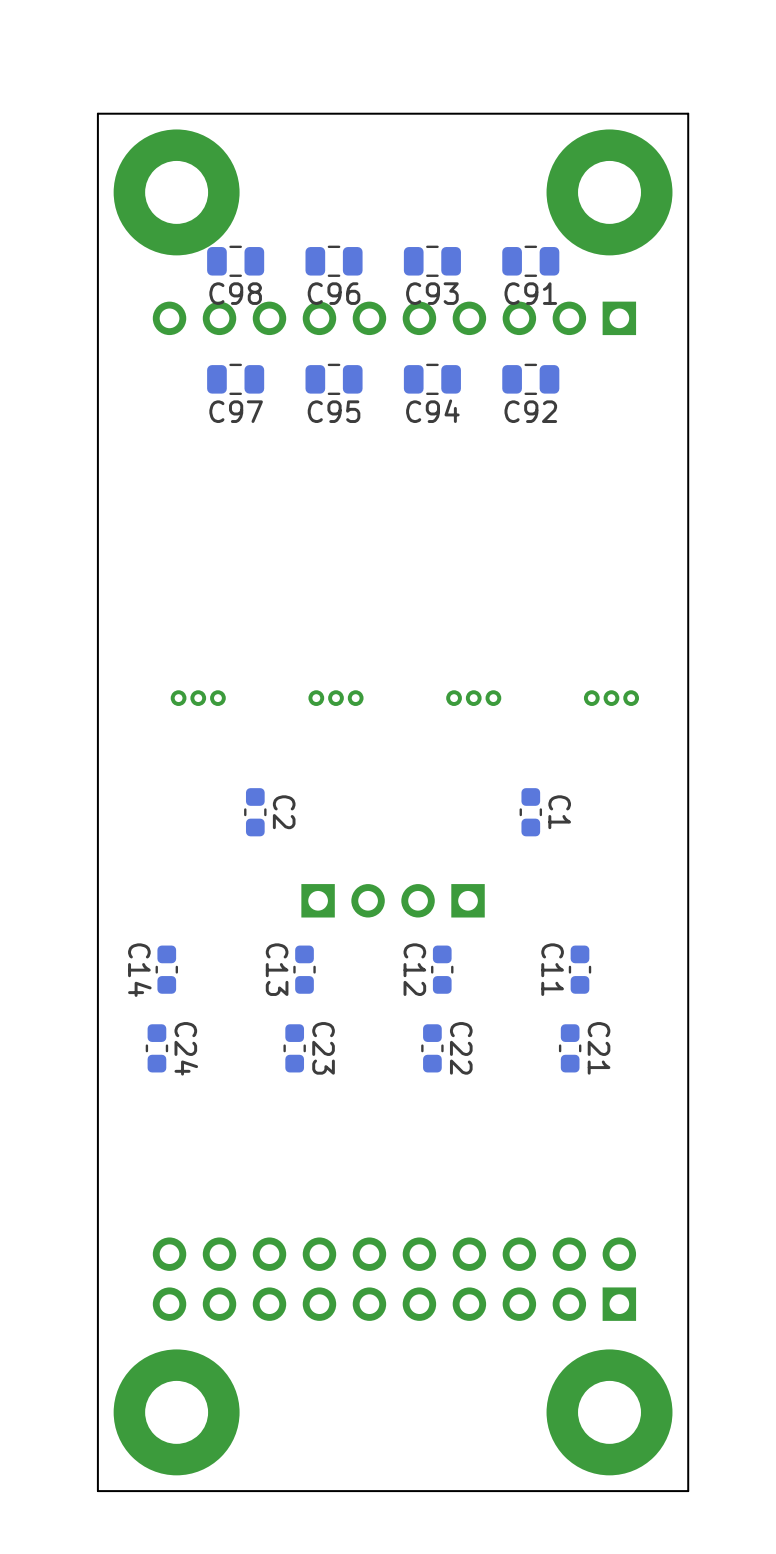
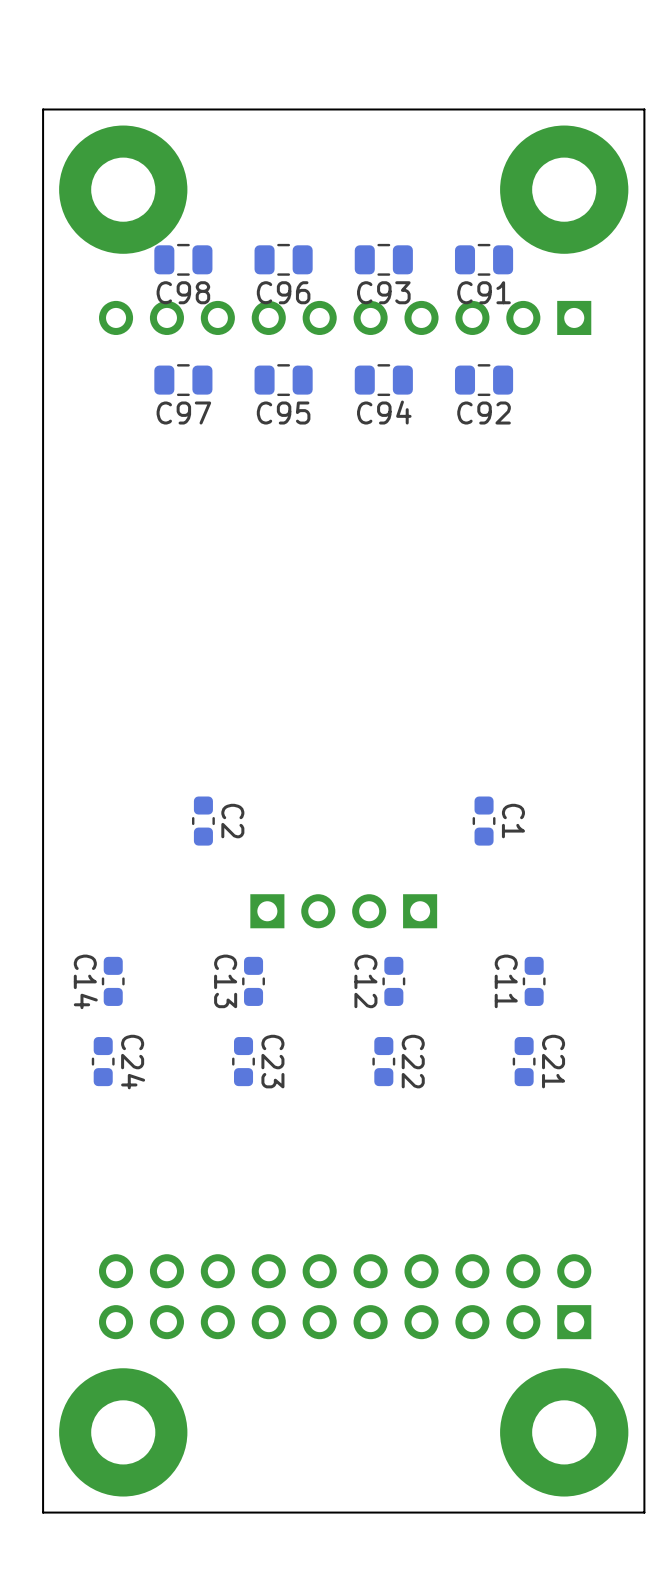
via: (178, 698) -> none
via: (198, 698) -> none
via: (217, 698) -> none
via: (316, 698) -> none
via: (335, 698) -> none
via: (355, 698) -> none
via: (454, 698) -> none
via: (473, 698) -> none
via: (493, 698) -> none
via: (591, 698) -> none
via: (611, 698) -> none
via: (631, 698) -> none

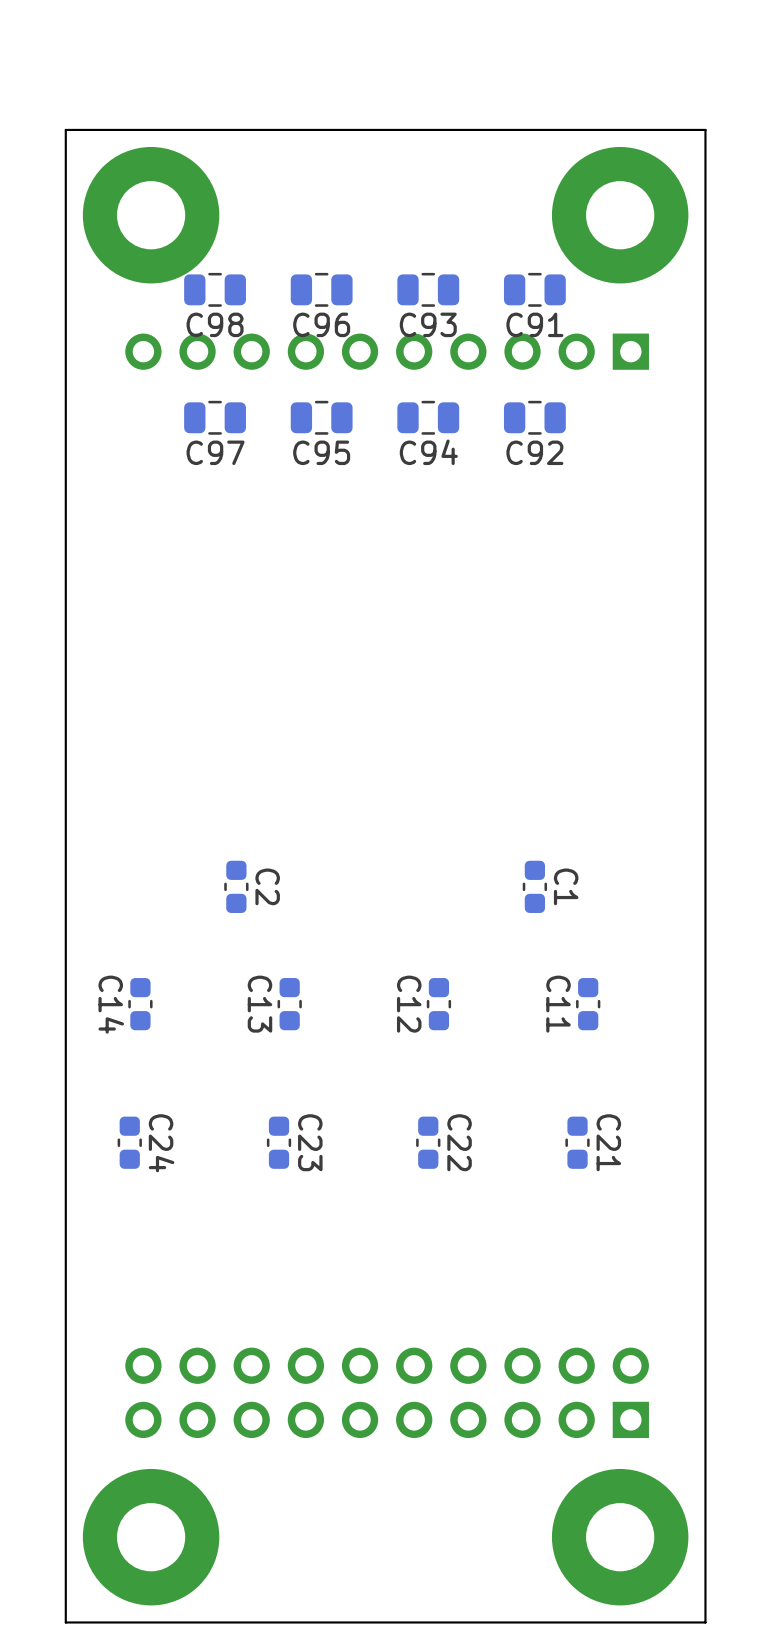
part: (292, 911) -> none
part: (394, 911) -> none
C14 position: (113, 981) -> (140, 1004)
C13 position: (253, 981) -> (289, 1004)
C12 position: (393, 981) -> (438, 1004)
C11 position: (534, 981) -> (588, 1004)

